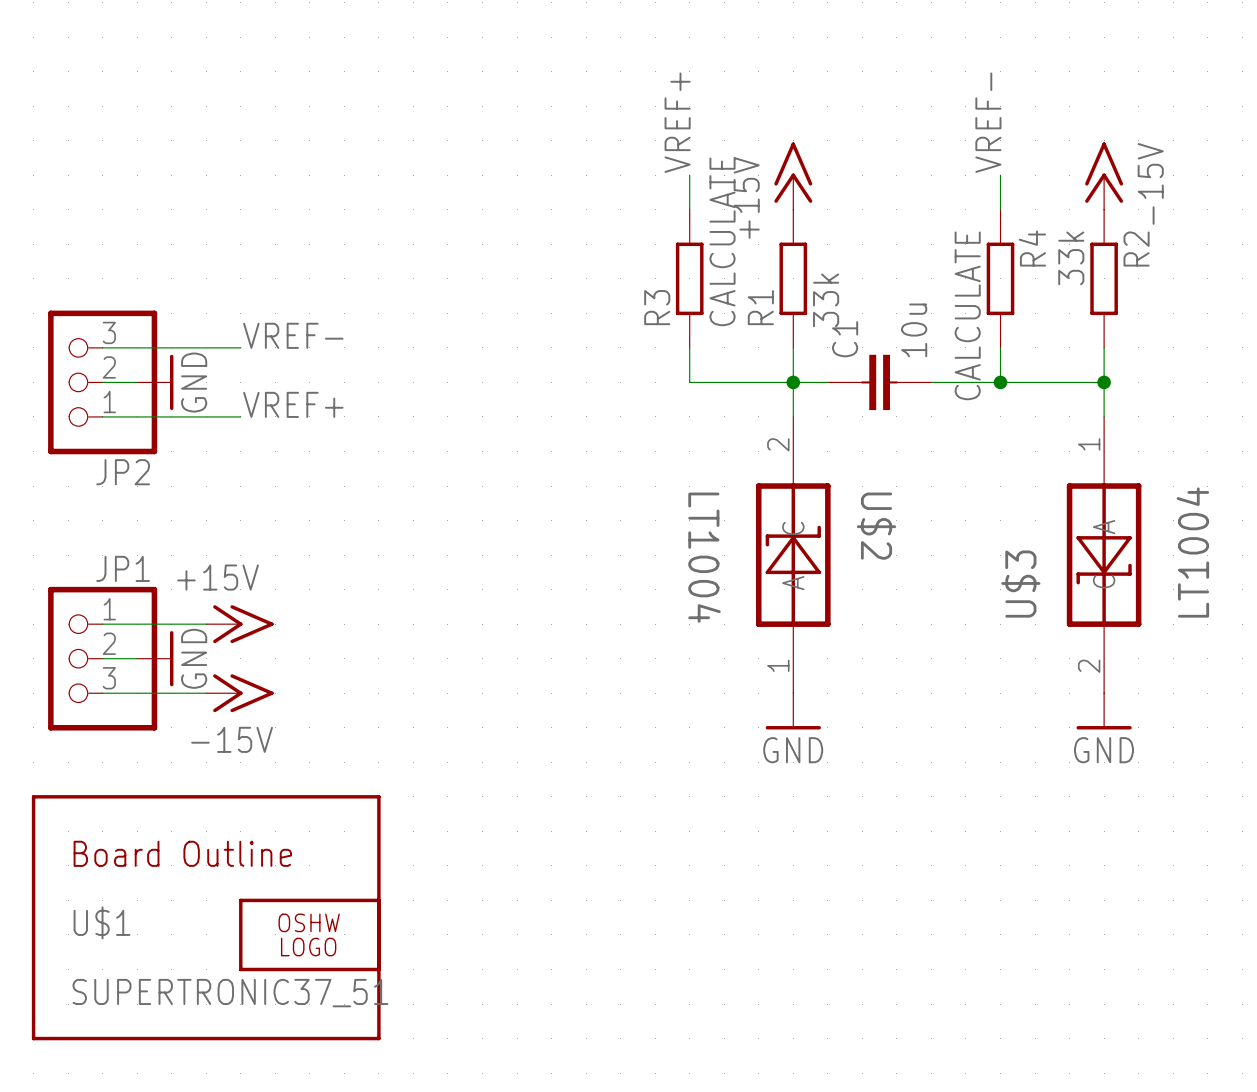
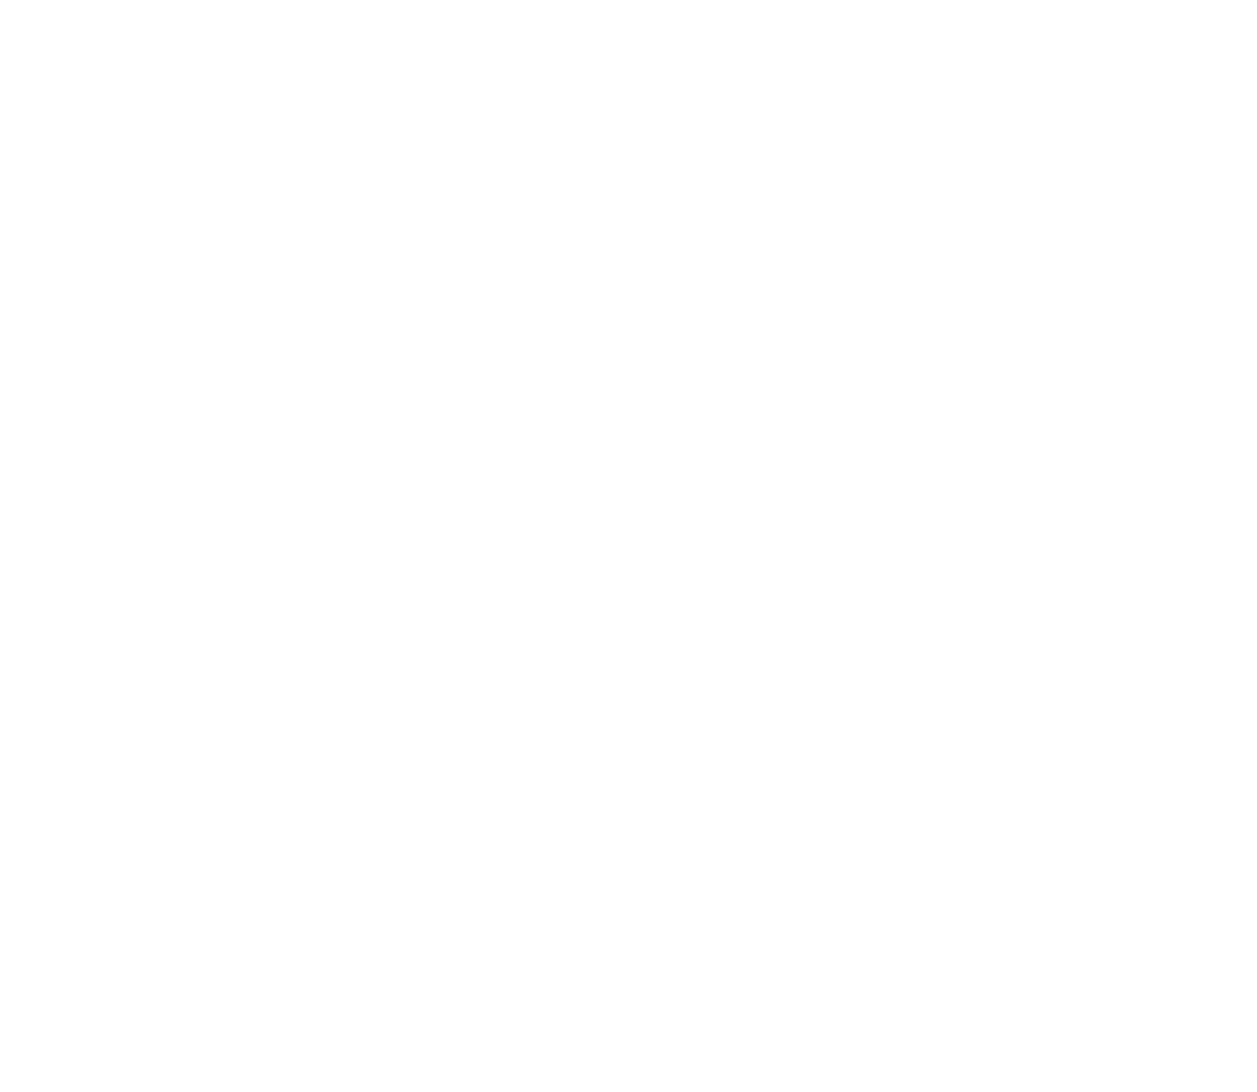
label: VREF+ (677, 122) -> none
label: VREF- (988, 122) -> none
wire: (689, 175) (689, 209) -> none
wire: (1000, 175) (1000, 209) -> none
power symbol: +15V (793, 176) -> none
power symbol: -15V (1104, 176) -> none
R3: CALCULATE (689, 278) -> none
R1: 33k (793, 278) -> none
R4: CALCULATE (1000, 278) -> none
R2: 33k (1104, 278) -> none
label: VREF- (293, 335) -> none
wire: (102, 347) (240, 347) -> none
wire: (689, 347) (689, 382) (827, 382) -> none
wire: (793, 347) (793, 416) -> none
wire: (1000, 347) (1000, 382) -> none
wire: (1104, 347) (1104, 416) -> none
wire: (102, 382) (137, 382) -> none
JP2: (102, 382) -> none
power symbol: GND (155, 382) -> none
junction: (793, 382) -> none
C1: 10u (879, 382) -> none
wire: (931, 382) (1104, 382) -> none
junction: (1000, 382) -> none
junction: (1104, 382) -> none
label: VREF+ (293, 404) -> none
wire: (102, 416) (240, 416) -> none
U$2: LT1004 (793, 555) -> none
U$3: LT1004 (1104, 555) -> none
wire: (102, 624) (206, 624) -> none
power symbol: +15V (239, 624) -> none
wire: (102, 658) (137, 658) -> none
JP1: (102, 658) -> none
power symbol: GND (155, 658) -> none
wire: (102, 693) (206, 693) -> none
power symbol: -15V (239, 693) -> none
power symbol: GND (793, 711) -> none
power symbol: GND (1104, 711) -> none
U$1: SUPERTRONIC37_51 (206, 917) -> none
part: (309, 934) -> none

